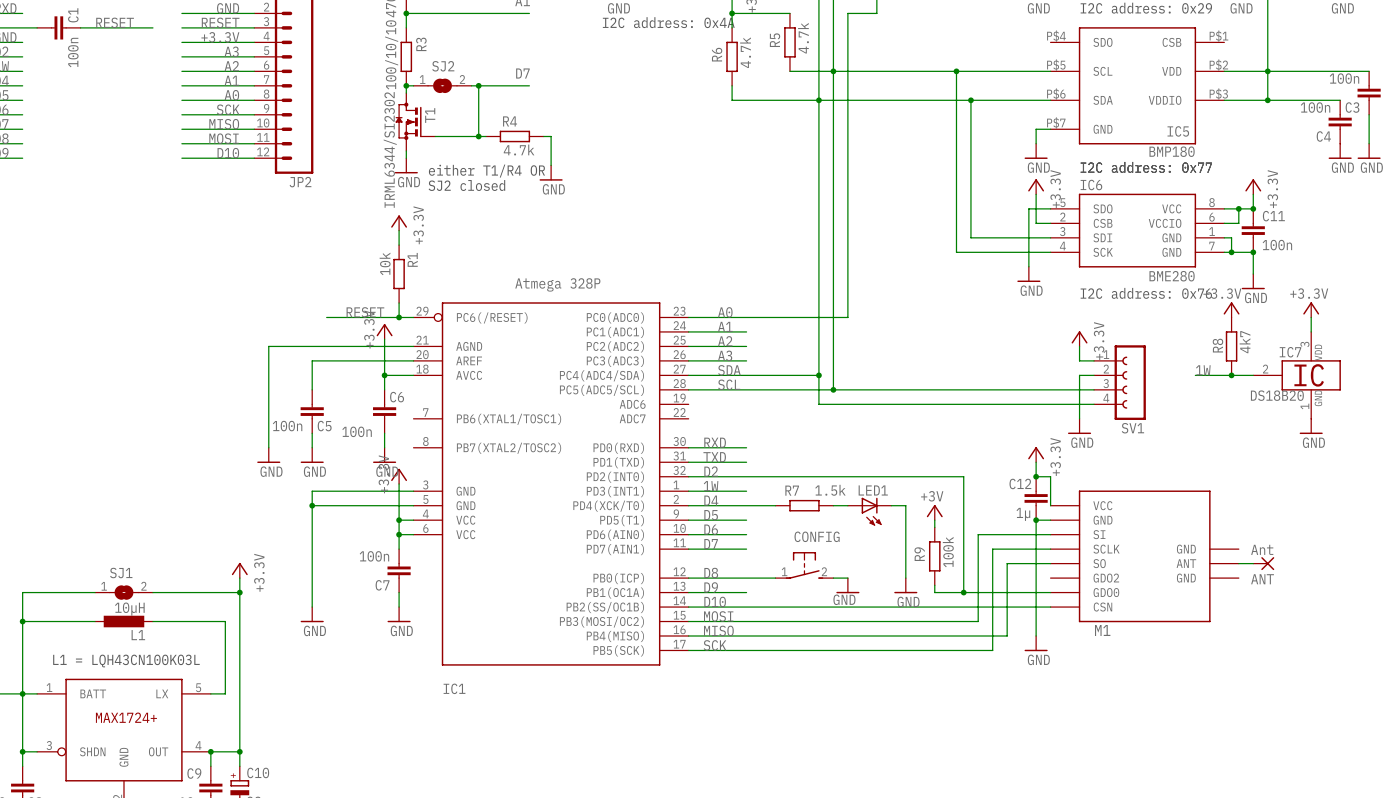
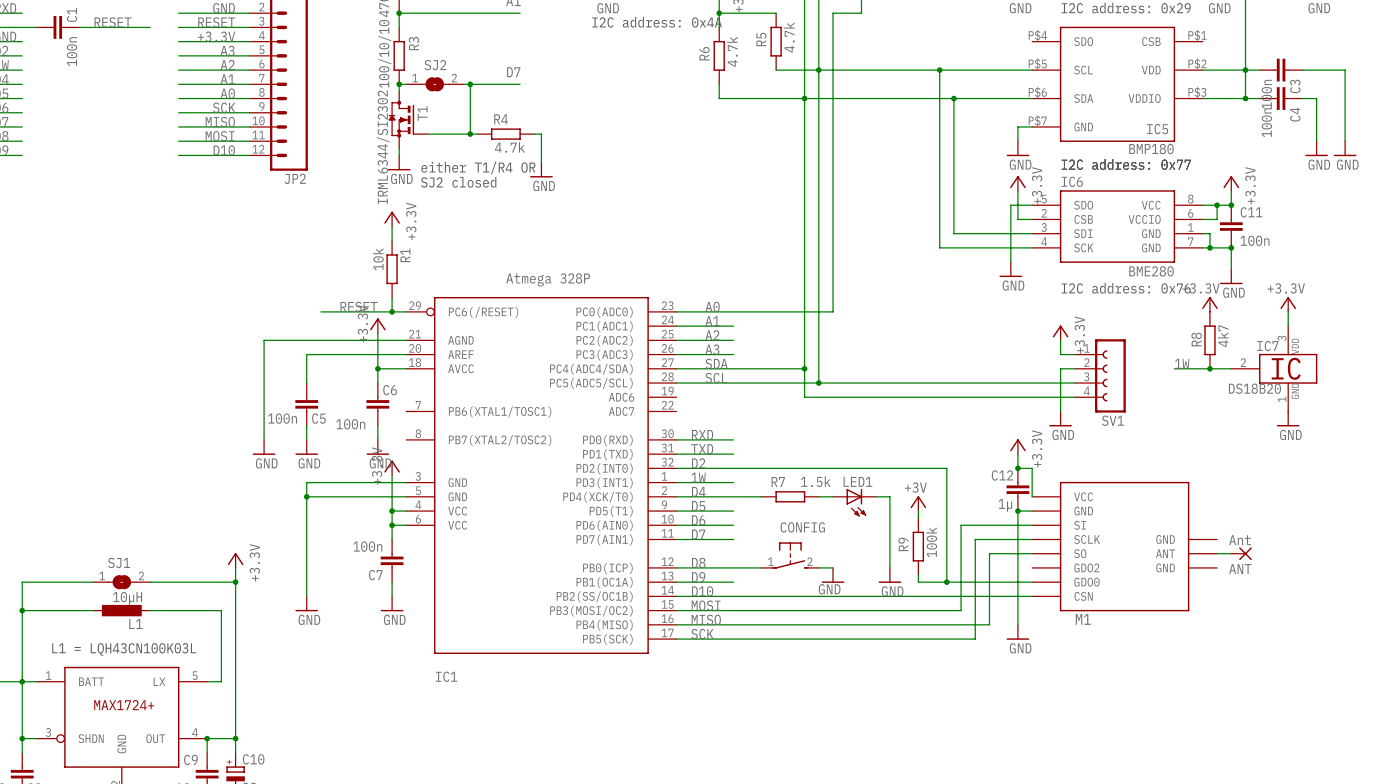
C3 value position: 100n (1344, 78) -> 100n (1266, 94)
C3 rotation: 0° (1369, 93) -> 90° clockwise (1281, 70)
C3 position: (1369, 93) -> (1281, 70)
C4 value position: 100n (1315, 107) -> 100n (1266, 122)
C3 name position: C3 (1352, 107) -> C3 (1295, 86)
C4 rotation: 0° (1340, 122) -> 90° clockwise (1281, 98)
C4 position: (1340, 122) -> (1281, 98)
C4 name position: C4 (1323, 136) -> C4 (1295, 114)

